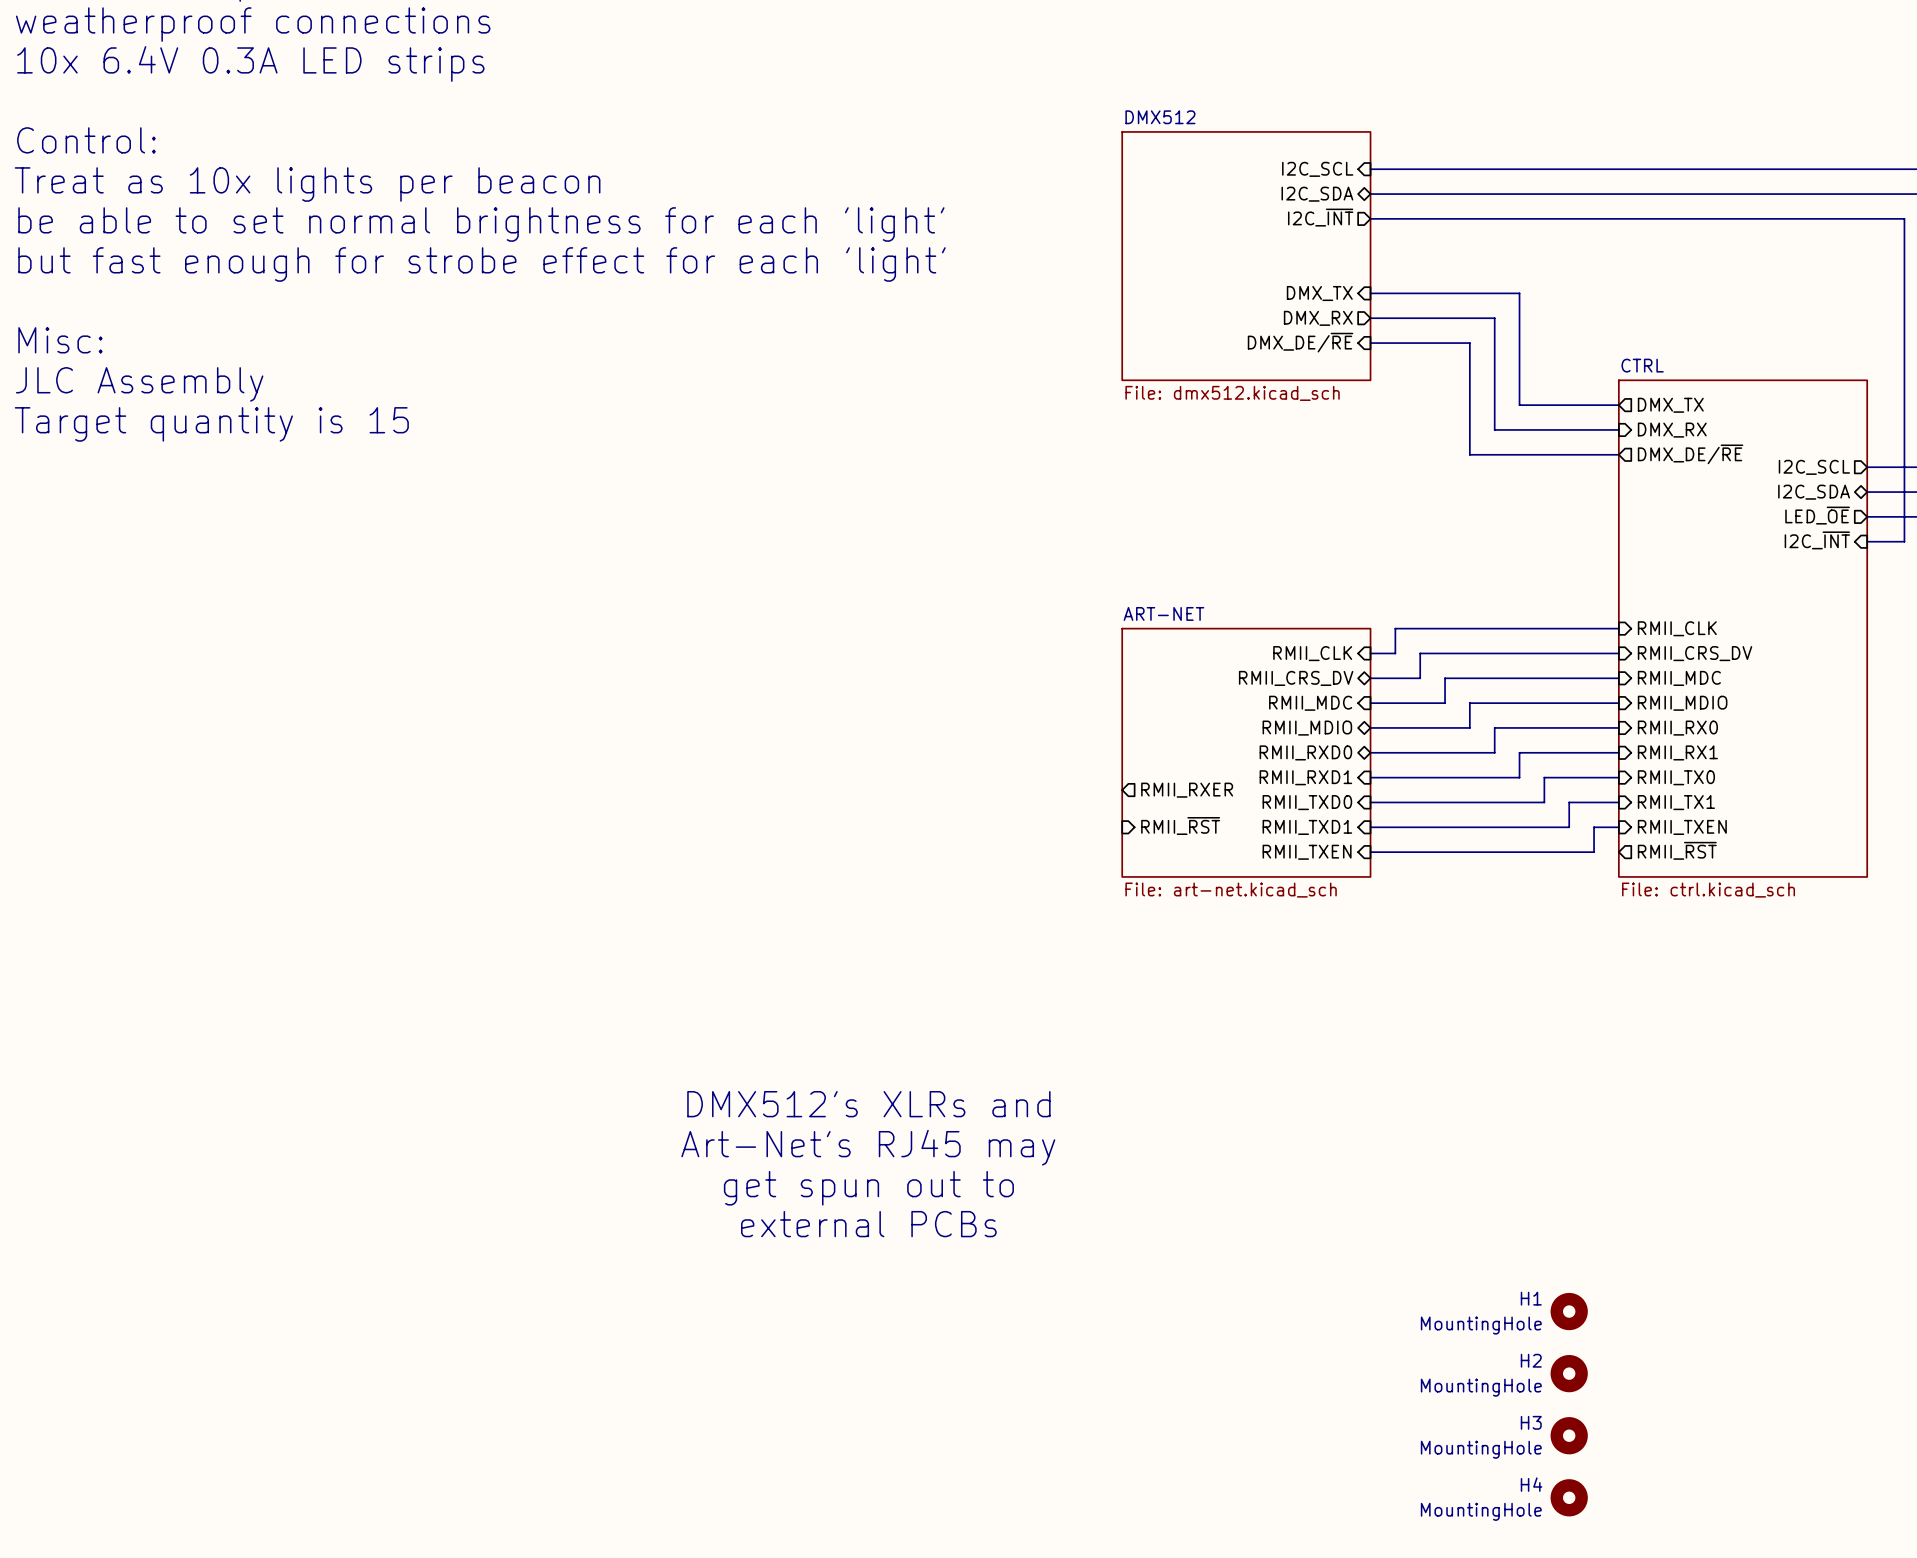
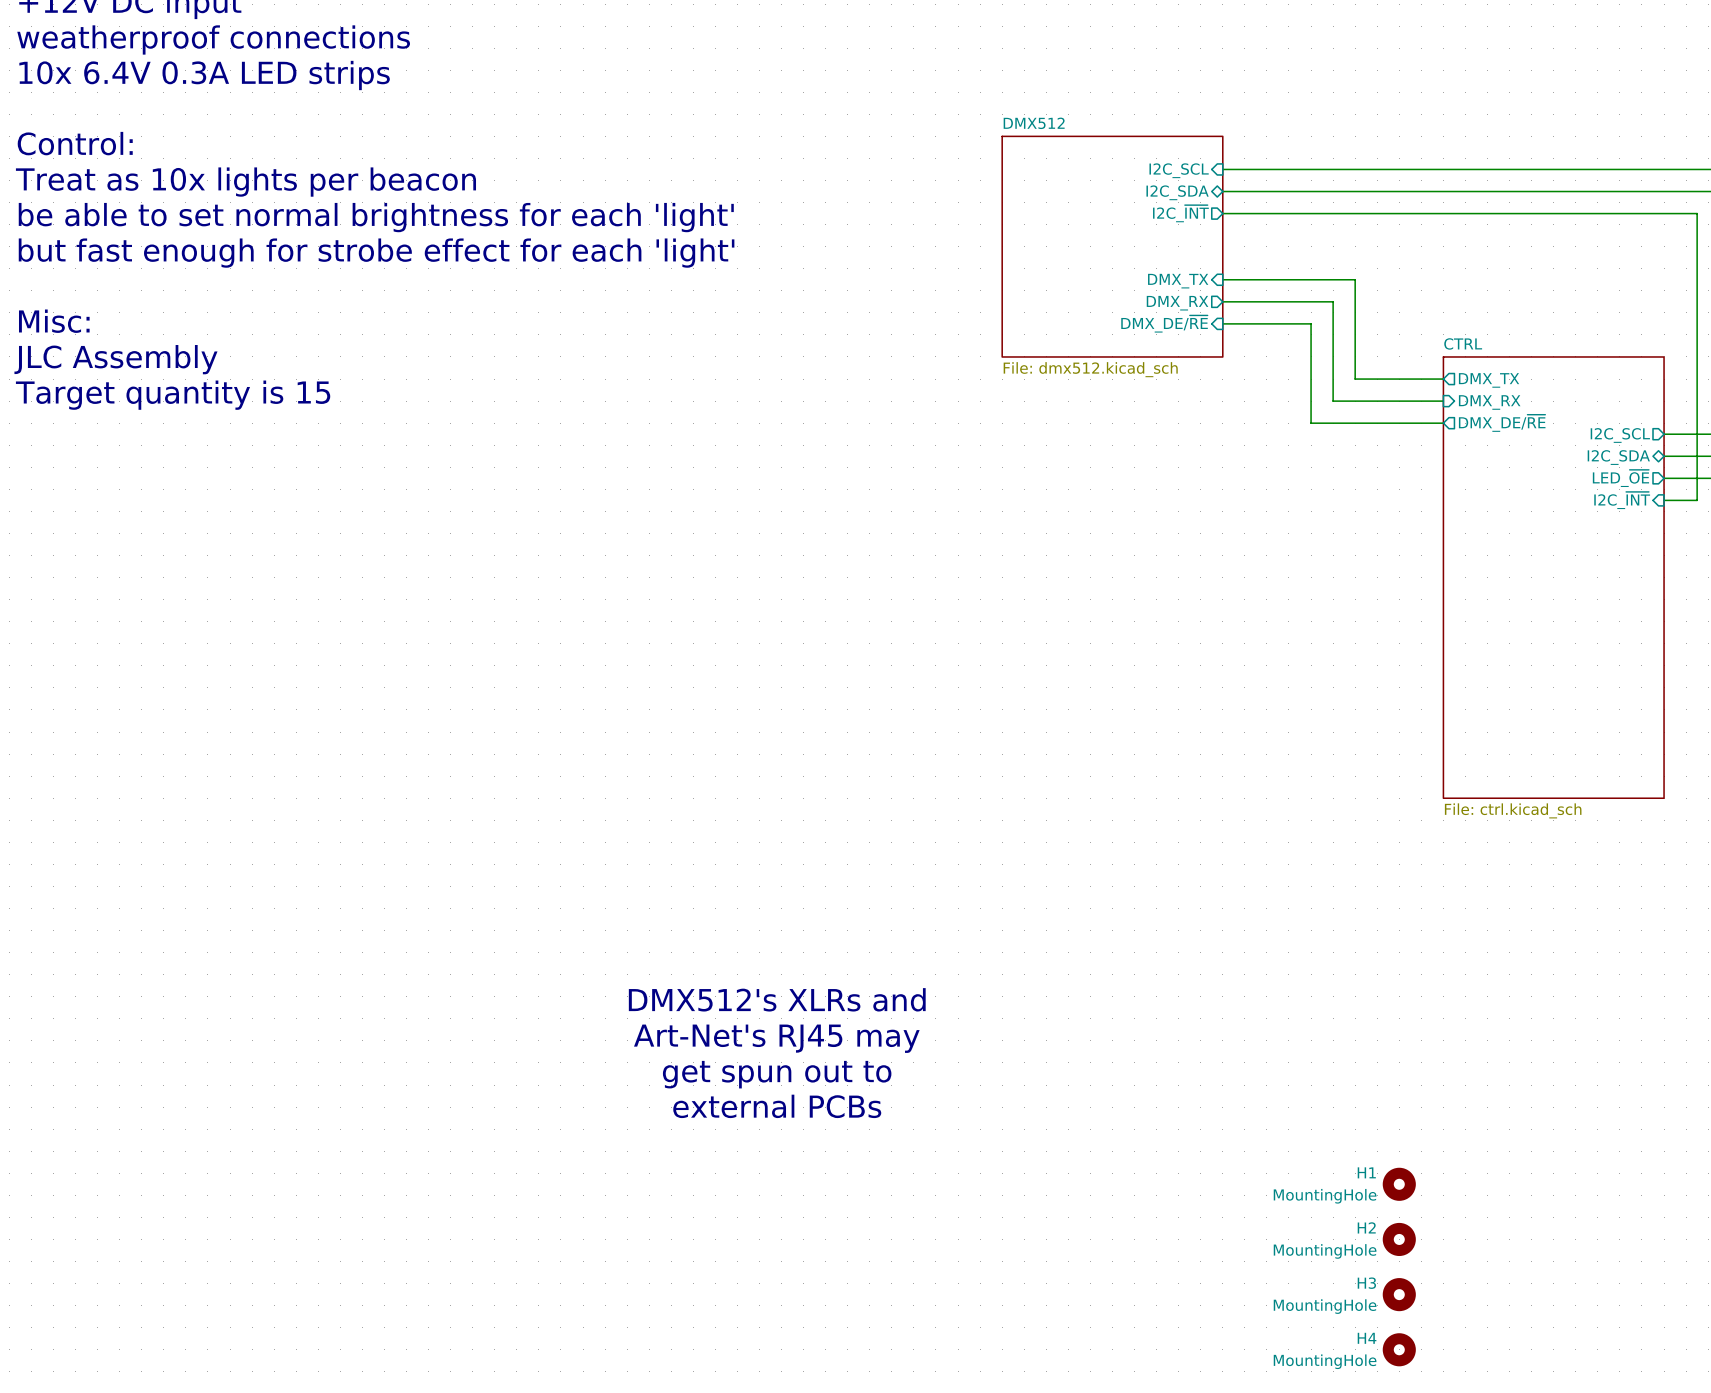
wire: (1618, 628) (1395, 628) (1395, 653) (1370, 653) -> none
sheet pin: RMII_CLK (1677, 628) -> none
sheet pin: RMII_CLK (1312, 653) -> none
wire: (1618, 653) (1420, 653) (1420, 678) (1370, 678) -> none
sheet pin: RMII_CRS_DV (1695, 653) -> none
sheet pin: RMII_CRS_DV (1296, 678) -> none
wire: (1618, 678) (1445, 678) (1445, 703) (1370, 703) -> none
sheet pin: RMII_MDC (1679, 678) -> none
sheet pin: RMII_MDC (1310, 703) -> none
wire: (1618, 703) (1469, 703) (1469, 727) (1370, 727) -> none
sheet pin: RMII_MDIO (1682, 703) -> none
wire: (1618, 727) (1494, 727) (1494, 752) (1370, 752) -> none
sheet pin: RMII_MDIO (1307, 728) -> none
sheet pin: RMII_RX0 (1677, 728) -> none
sheet ART-NET: File: art-net.kicad_sch (1246, 752) -> none
sheet pin: RMII_RXD0 (1305, 752) -> none
wire: (1618, 752) (1519, 752) (1519, 777) (1370, 777) -> none
sheet pin: RMII_RX1 (1677, 752) -> none
sheet pin: RMII_RXD1 (1305, 777) -> none
wire: (1618, 777) (1544, 777) (1544, 802) (1370, 802) -> none
sheet pin: RMII_TX0 (1676, 777) -> none
sheet pin: RMII_RXER (1187, 790) -> none
sheet pin: RMII_TXD0 (1307, 802) -> none
wire: (1618, 802) (1569, 802) (1569, 827) (1370, 827) -> none
sheet pin: RMII_TX1 (1676, 802) -> none
sheet pin: RMII_~{RST} (1180, 825) -> none
sheet pin: RMII_TXD1 (1307, 827) -> none
wire: (1618, 827) (1594, 827) (1594, 852) (1370, 852) -> none
sheet pin: RMII_TXEN (1682, 827) -> none
sheet pin: RMII_~{RST} (1677, 850) -> none
sheet pin: RMII_TXEN (1307, 852) -> none

